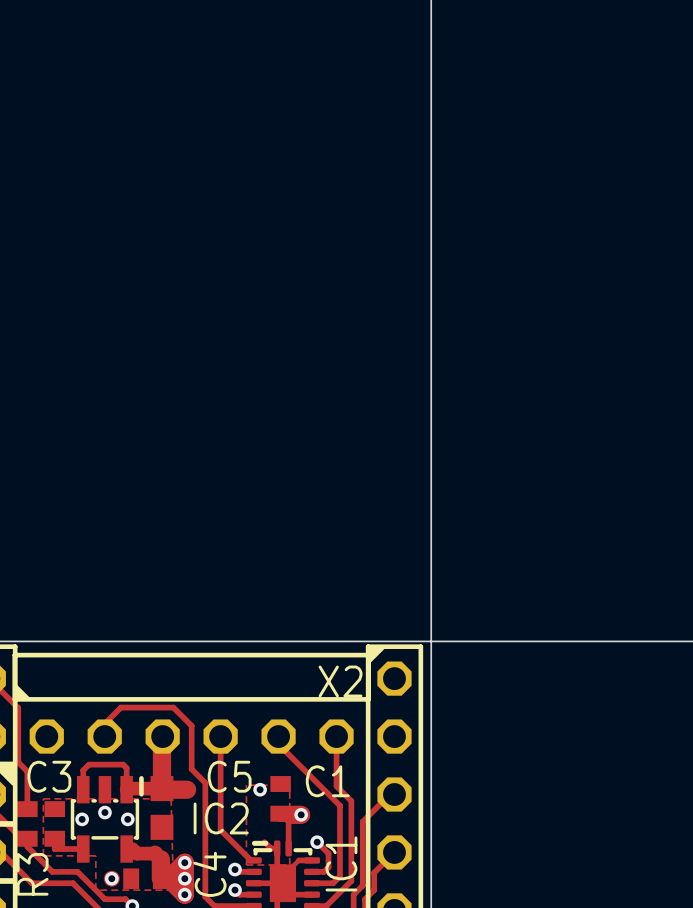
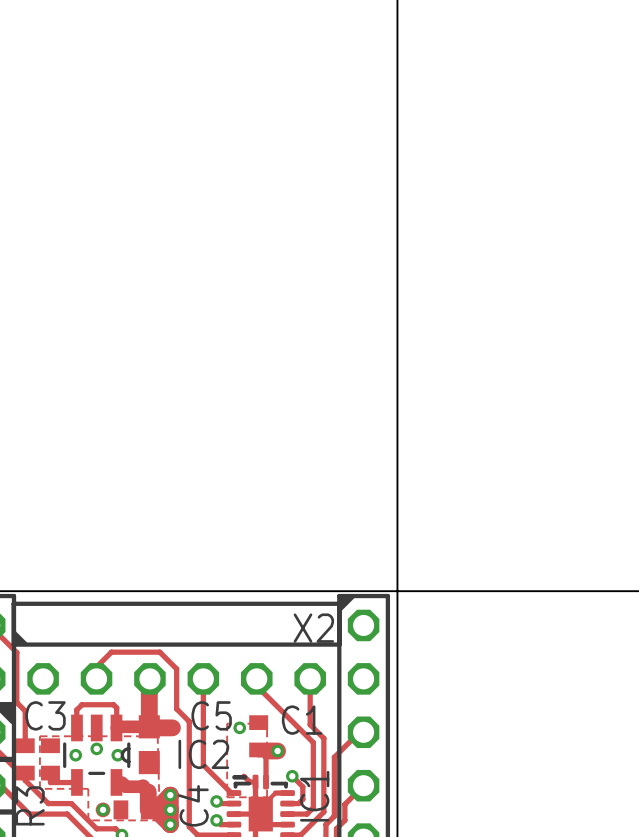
IC2 footprint: [70, 776, 140, 863] -> [63, 714, 131, 796]
line: (141, 778) (141, 794) -> none

